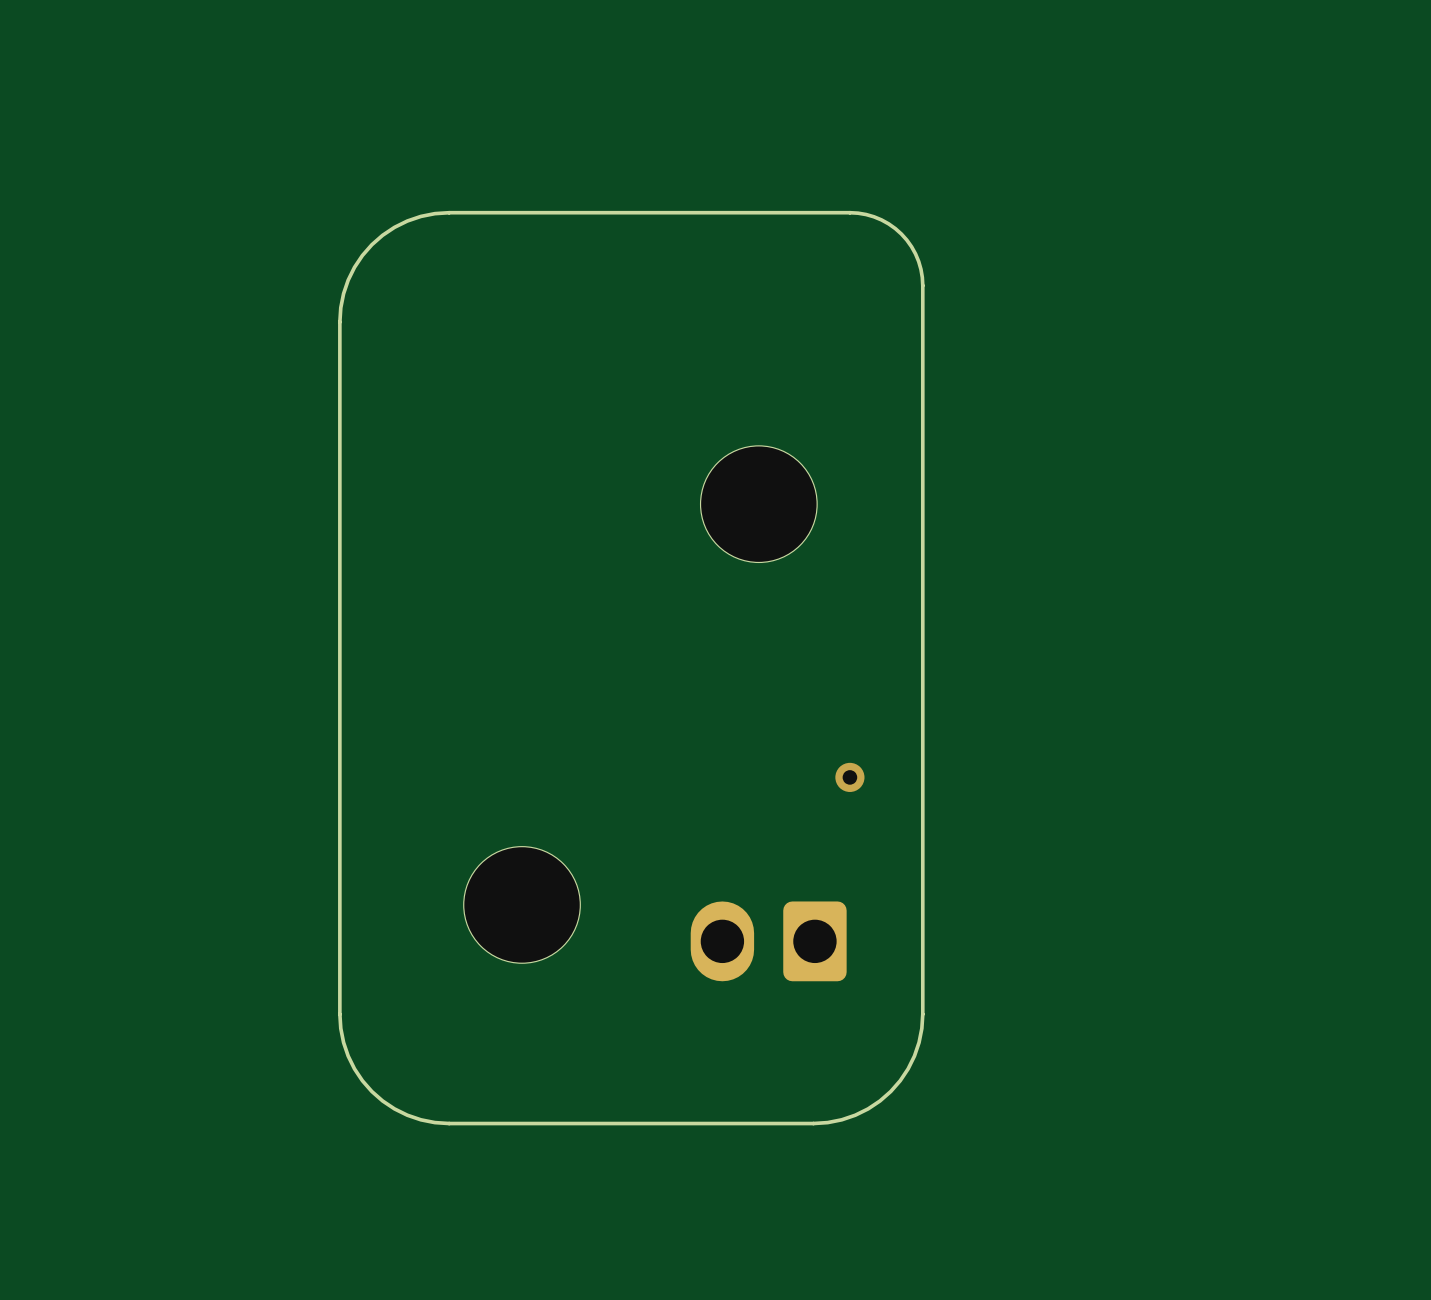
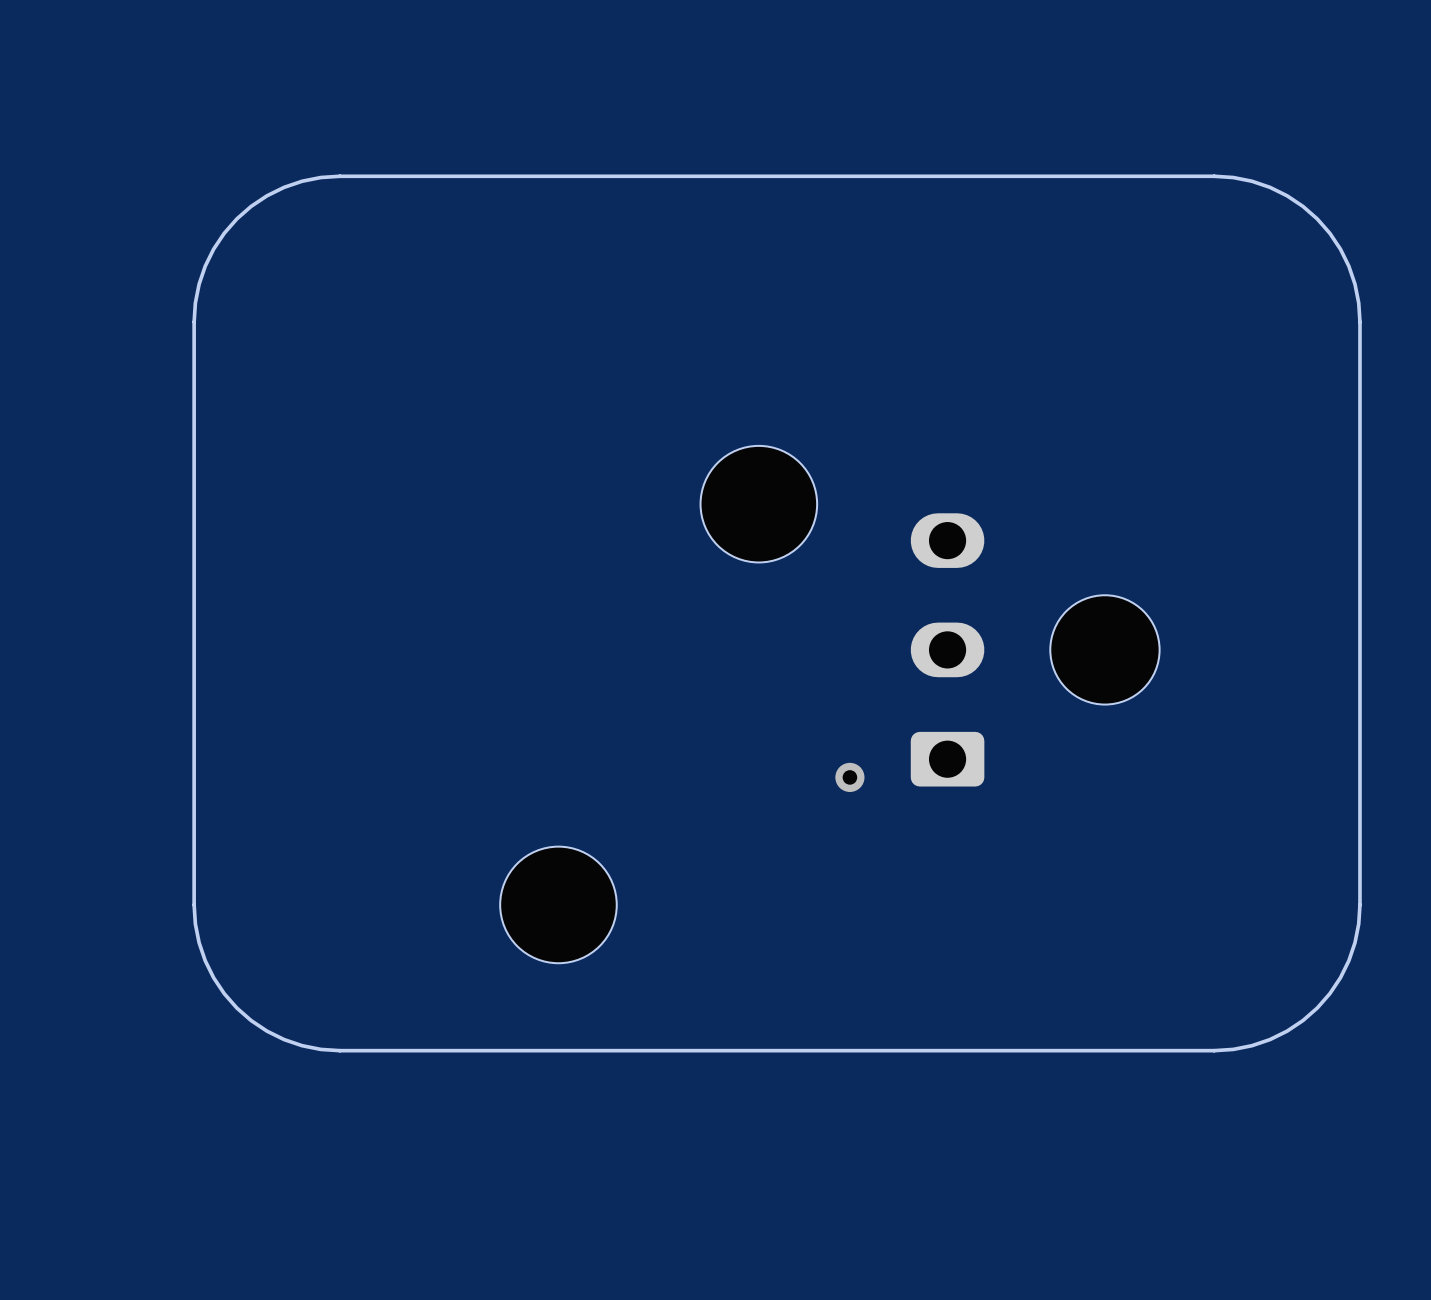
board edge: none -> (1214, 176) (339, 176) (302, 181) (284, 187) (251, 206) (224, 233) (213, 249) (199, 284) (194, 322) (194, 904) (199, 942) (205, 960) (224, 993) (236, 1007) (266, 1031) (302, 1045) (339, 1050) (1214, 1050) (1233, 1049) (1270, 1039) (1302, 1020) (1329, 993) (1340, 977) (1355, 942) (1358, 923) (1358, 302) (1355, 284) (1340, 249) (1329, 233) (1302, 206) (1270, 187) (1251, 181) (1214, 176)
board edge: (849, 212) (434, 213) (407, 221) (382, 235) (362, 255) (354, 267) (343, 293) (339, 322) (339, 1014) (343, 1042) (354, 1068) (371, 1091) (394, 1108) (420, 1119) (449, 1123) (827, 1122) (855, 1115) (880, 1100) (900, 1080) (908, 1068) (919, 1042) (922, 1014) (922, 277) (915, 253) (901, 234) (881, 219) (866, 214) (849, 212) -> none
part: none -> (1035, 649)
part position: (522, 904) -> (558, 904)
part: (768, 941) -> none

